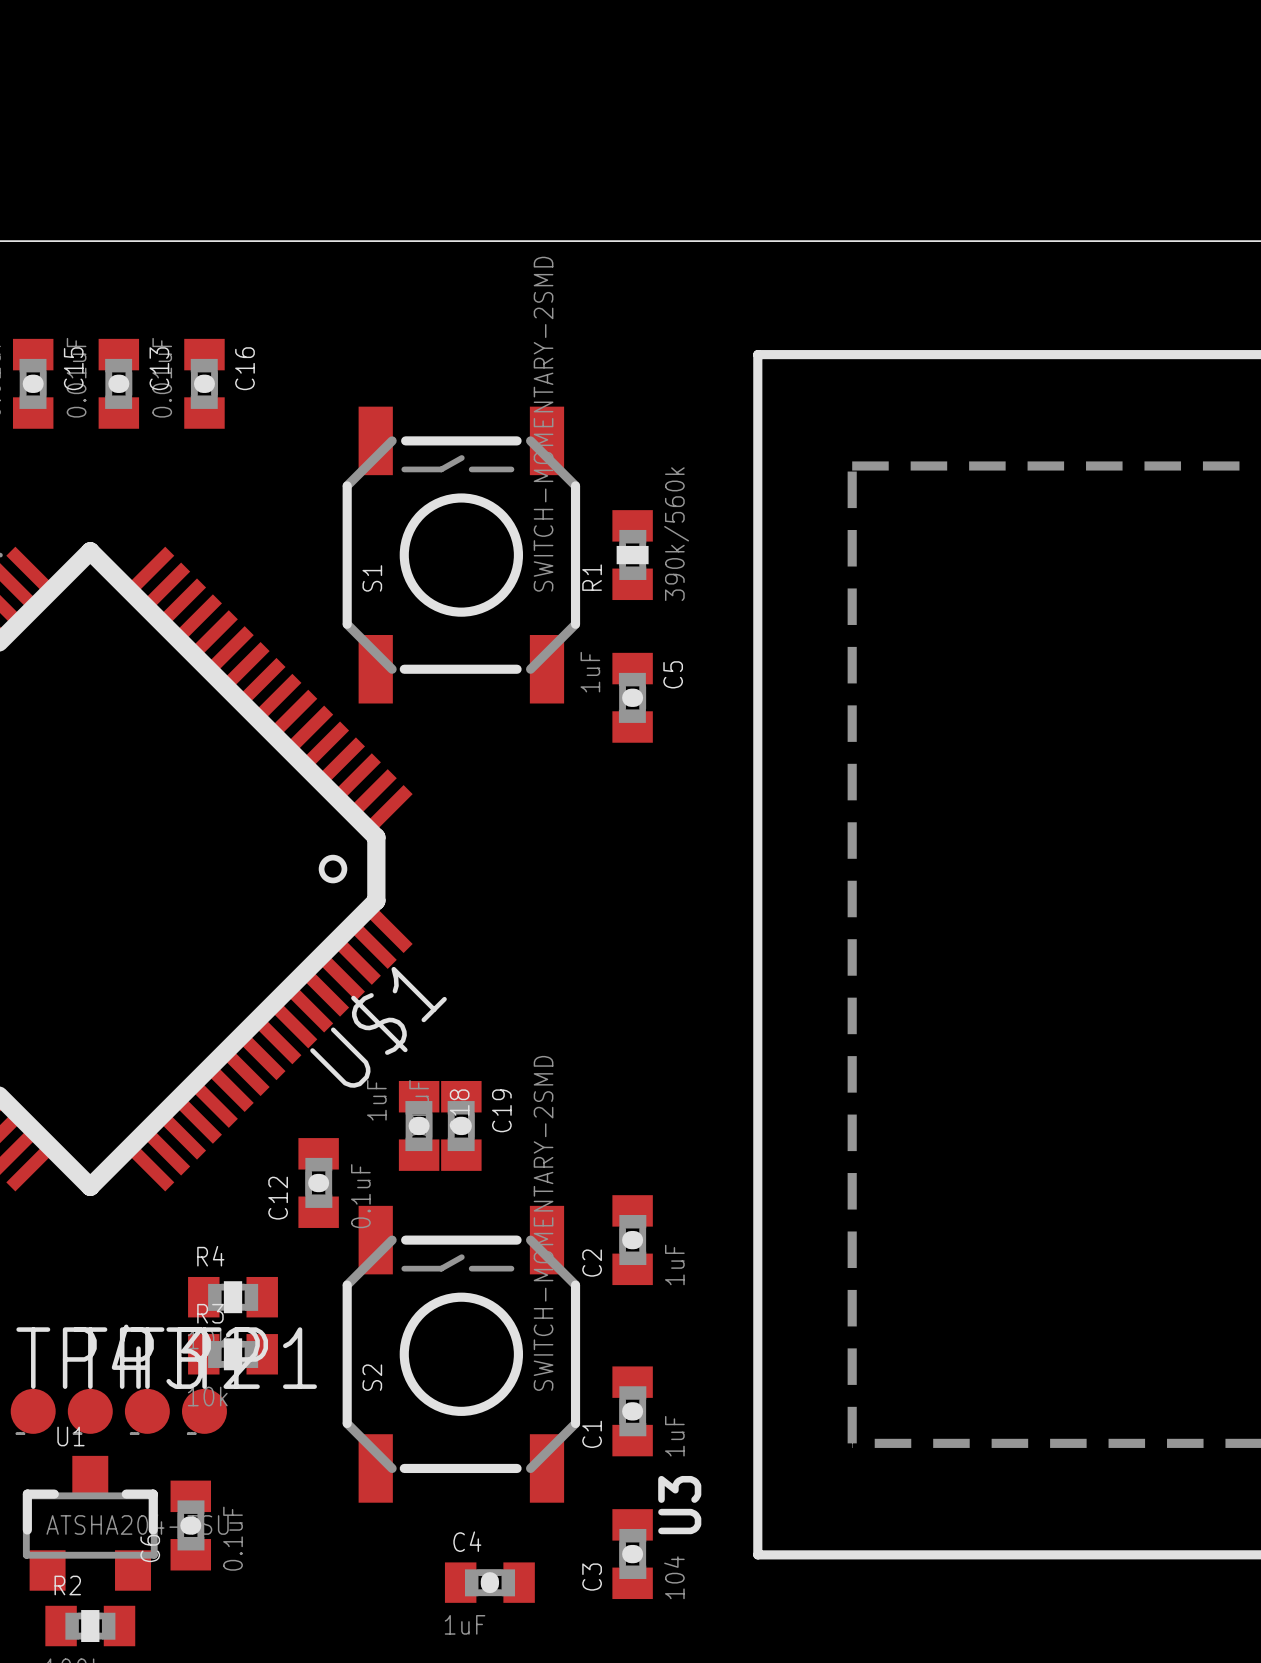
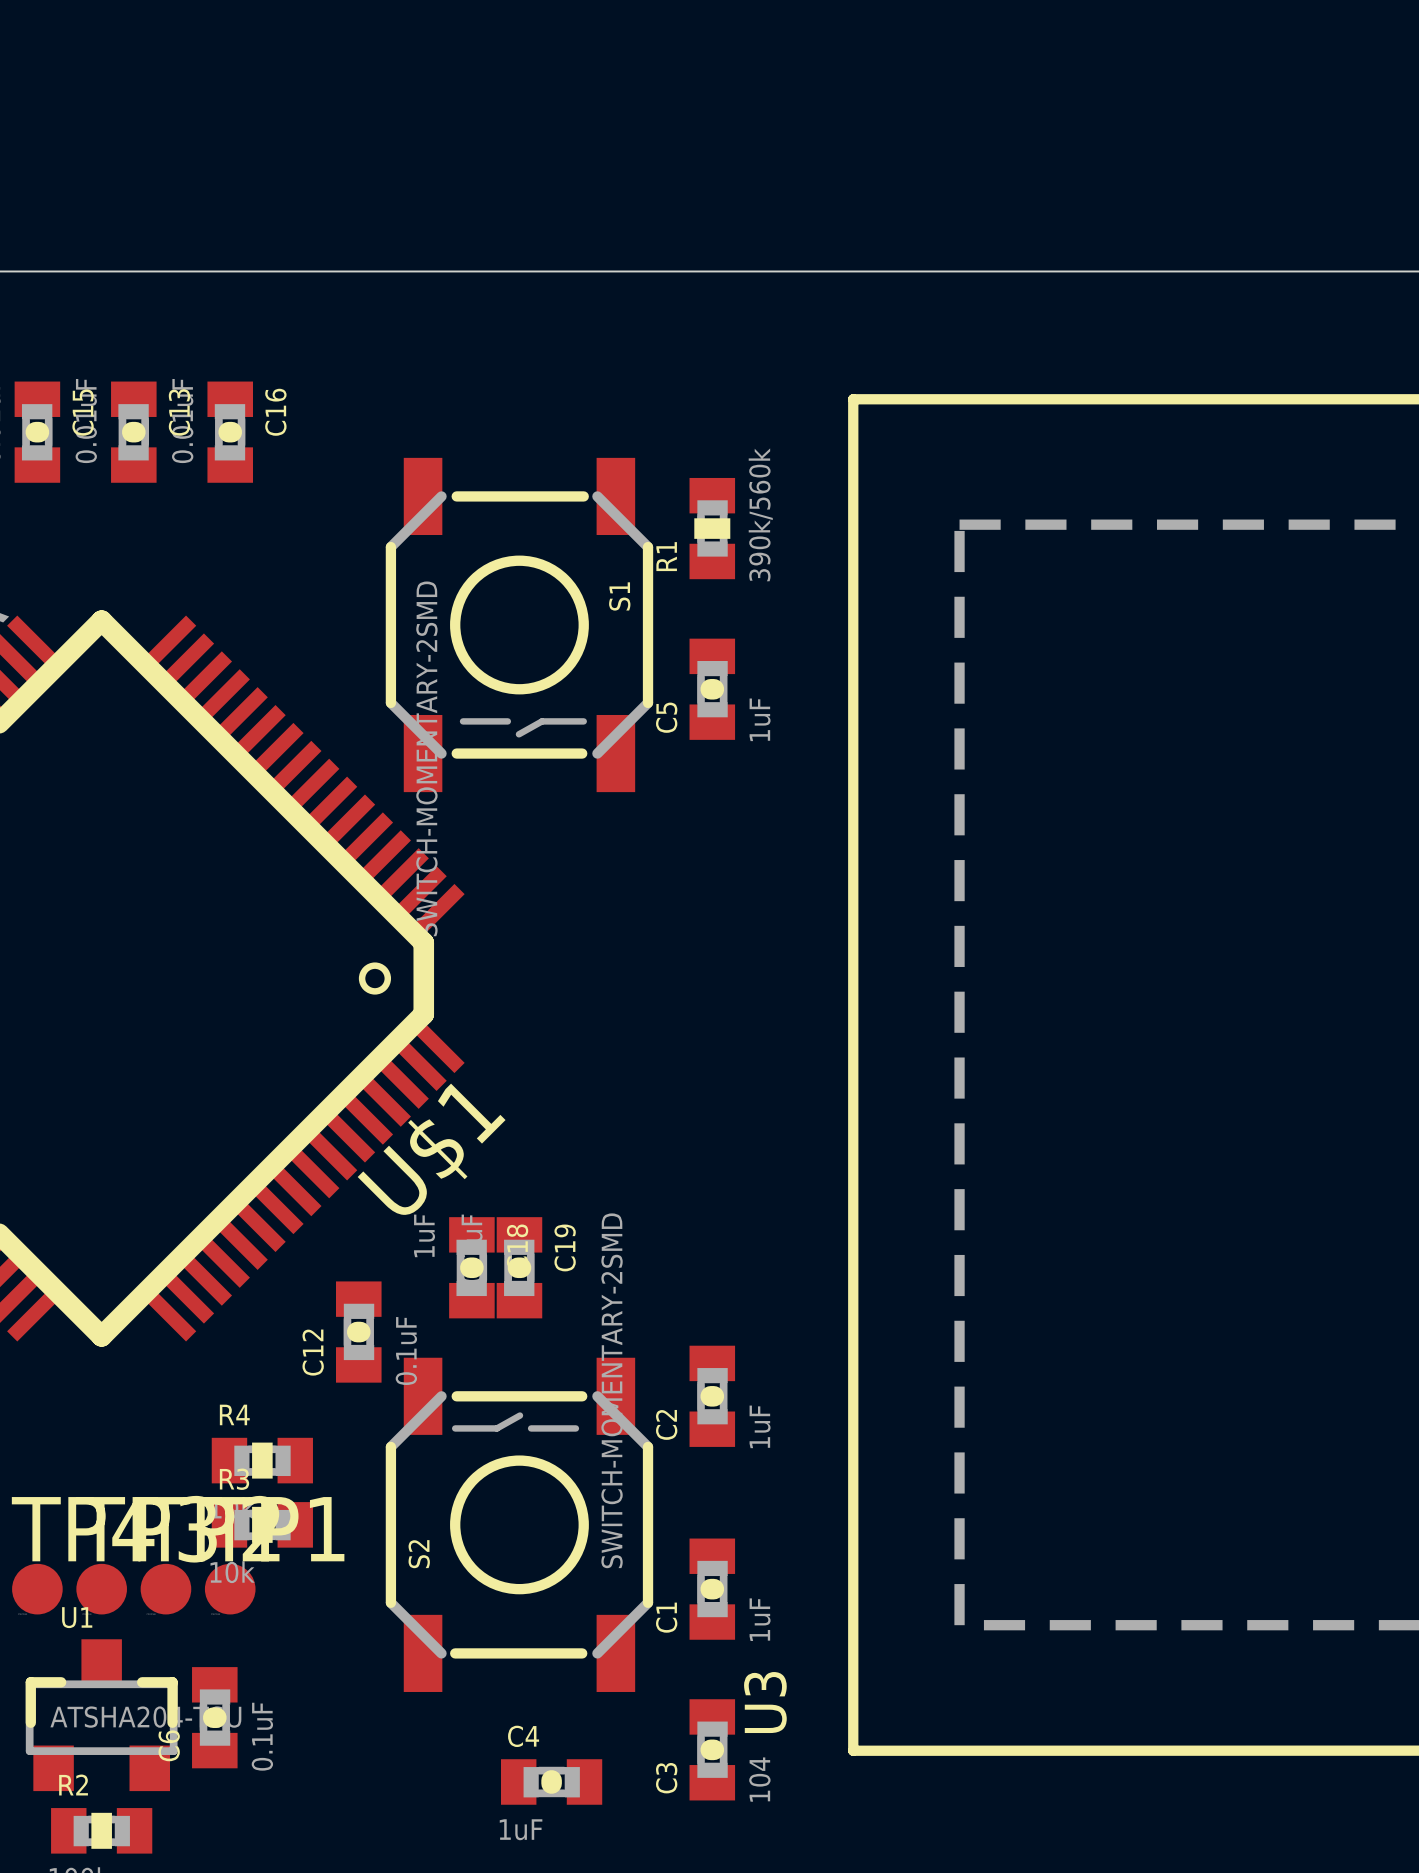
S1 rotation: 0° (461, 555) -> 180° (519, 624)
R1 position: (632, 555) -> (712, 528)
C5 value position: 1uF (590, 672) -> 1uF (760, 719)
C5 name position: C5 (673, 674) -> C5 (666, 717)
C5 position: (632, 697) -> (712, 689)

